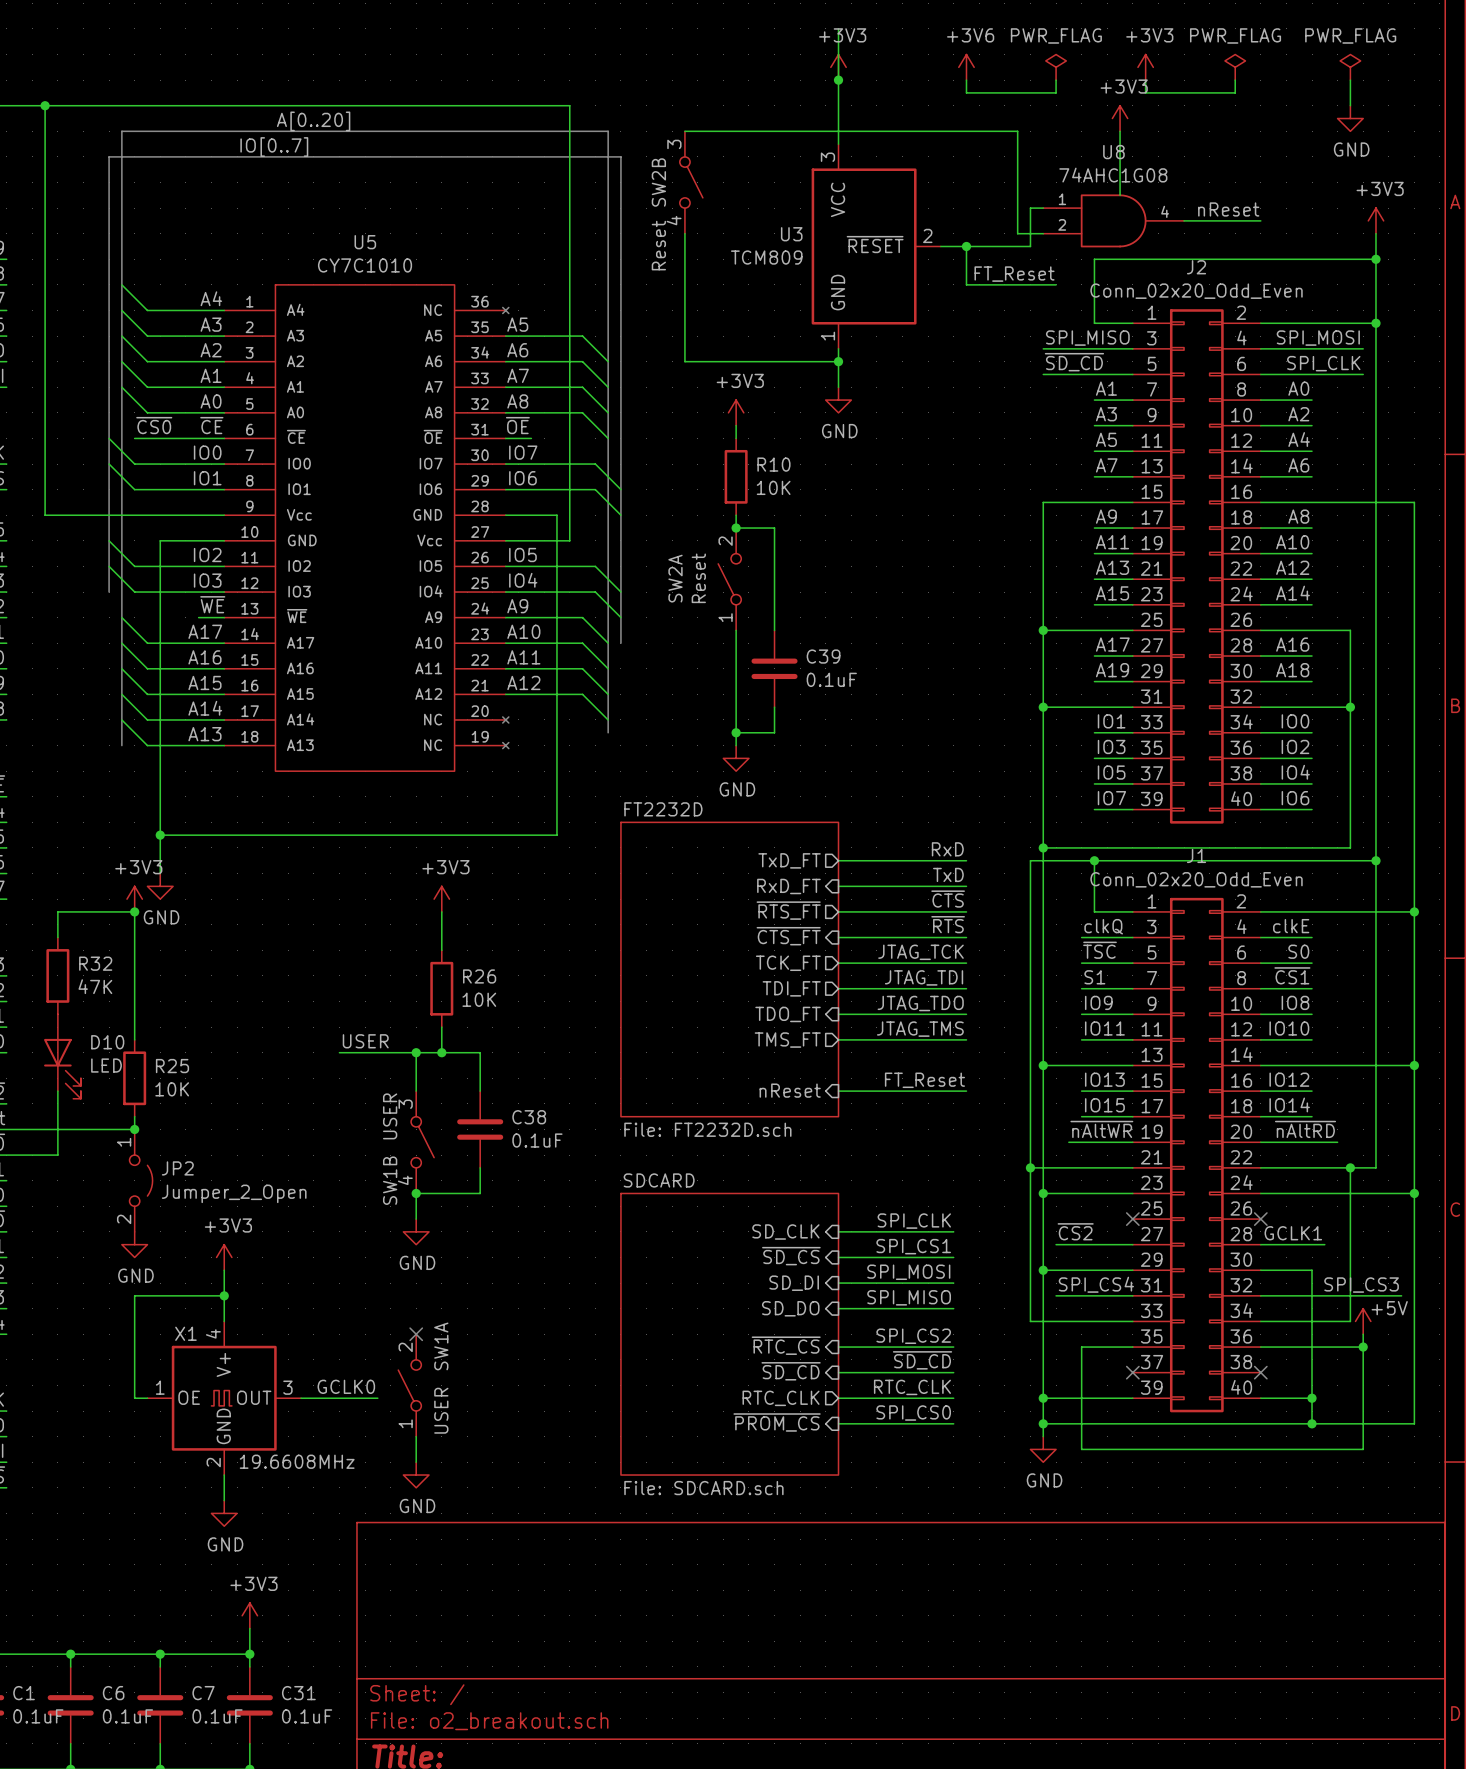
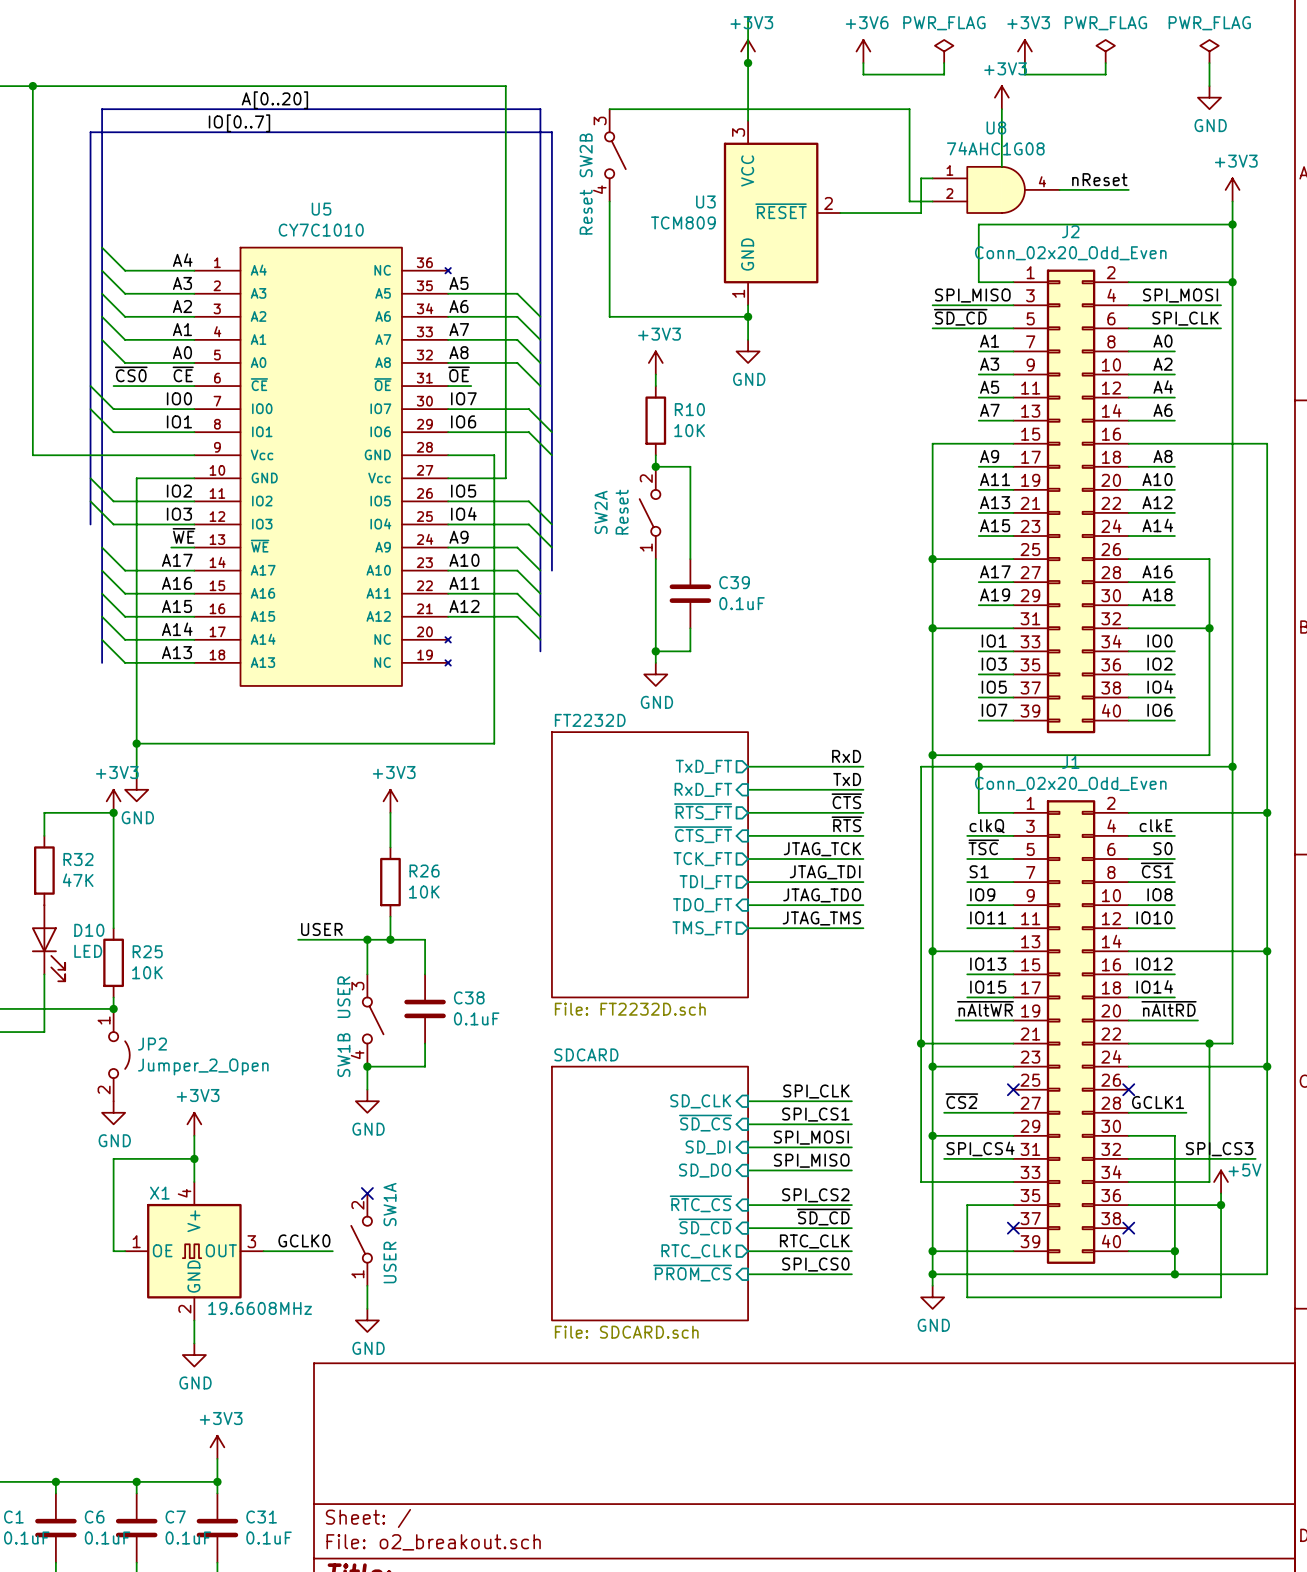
wire: (966, 246) (966, 284) (1056, 284) -> none
junction: (966, 246) -> none
label: FT_Reset (1014, 274) -> none
label: FT_Reset (924, 1080) -> none
sheet pin: nReset (790, 1090) -> none
wire: (838, 1091) (966, 1091) -> none

